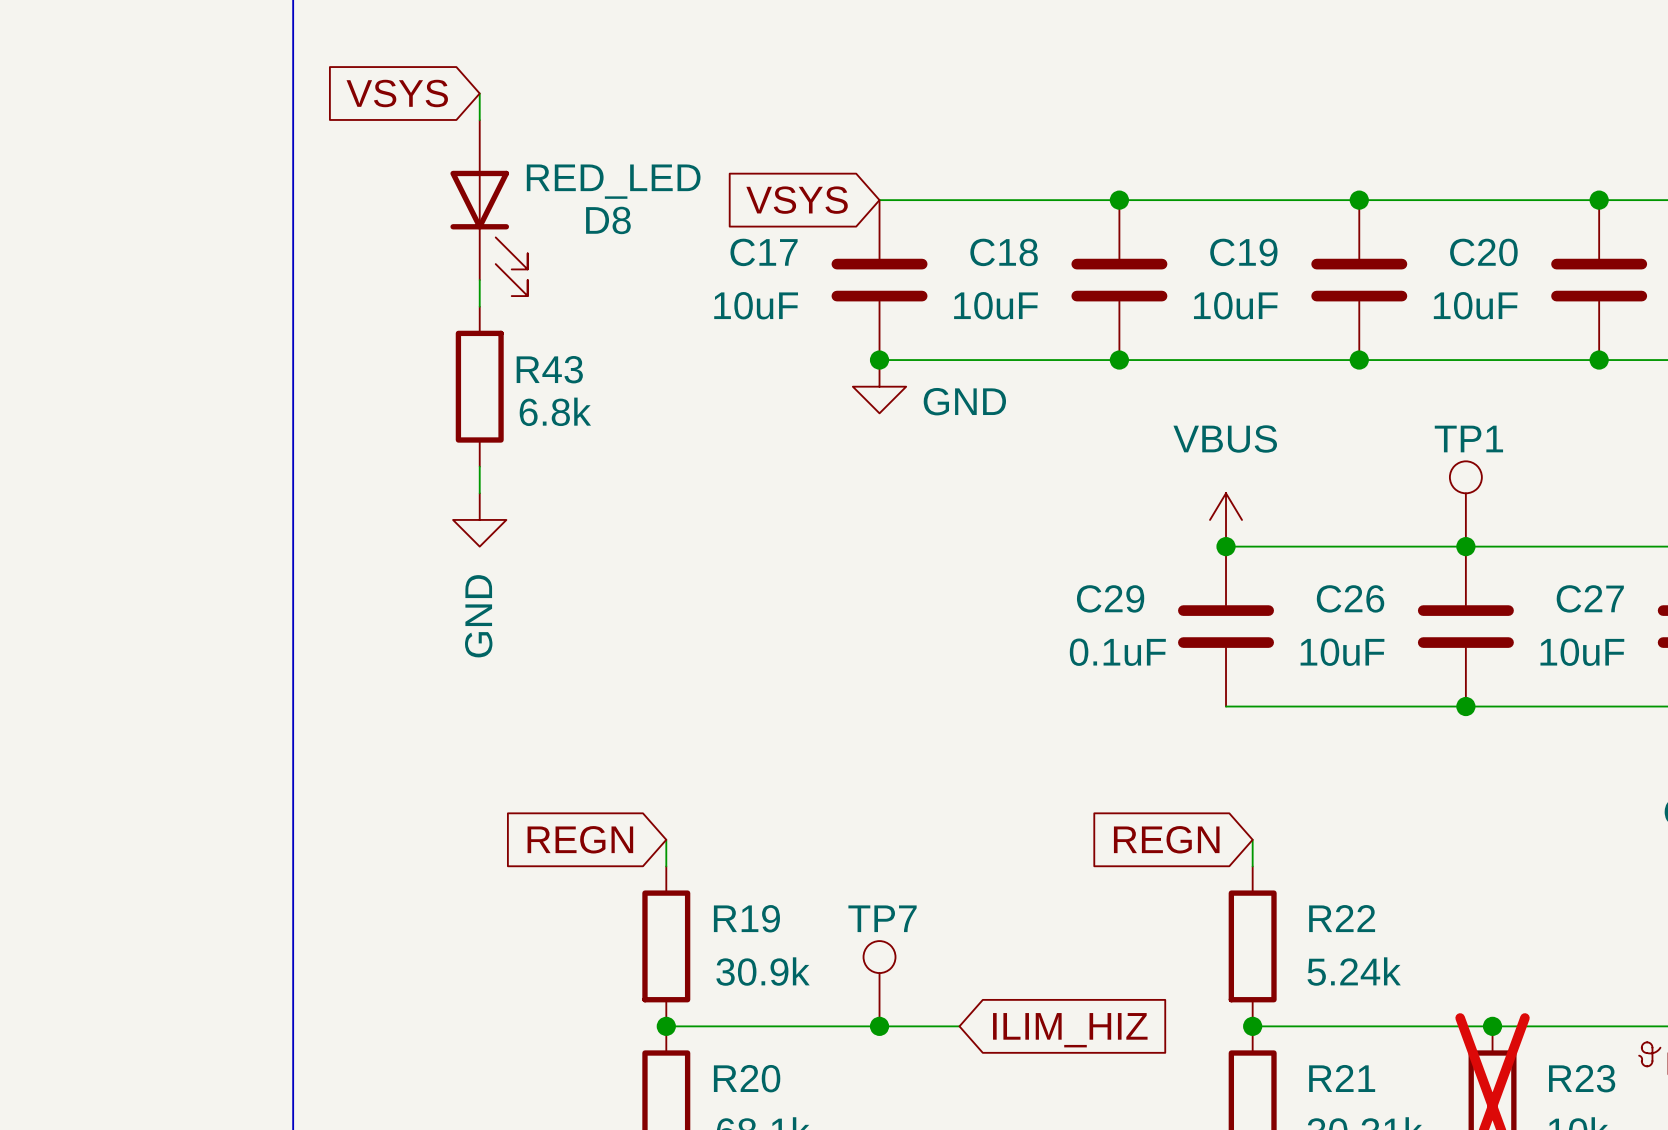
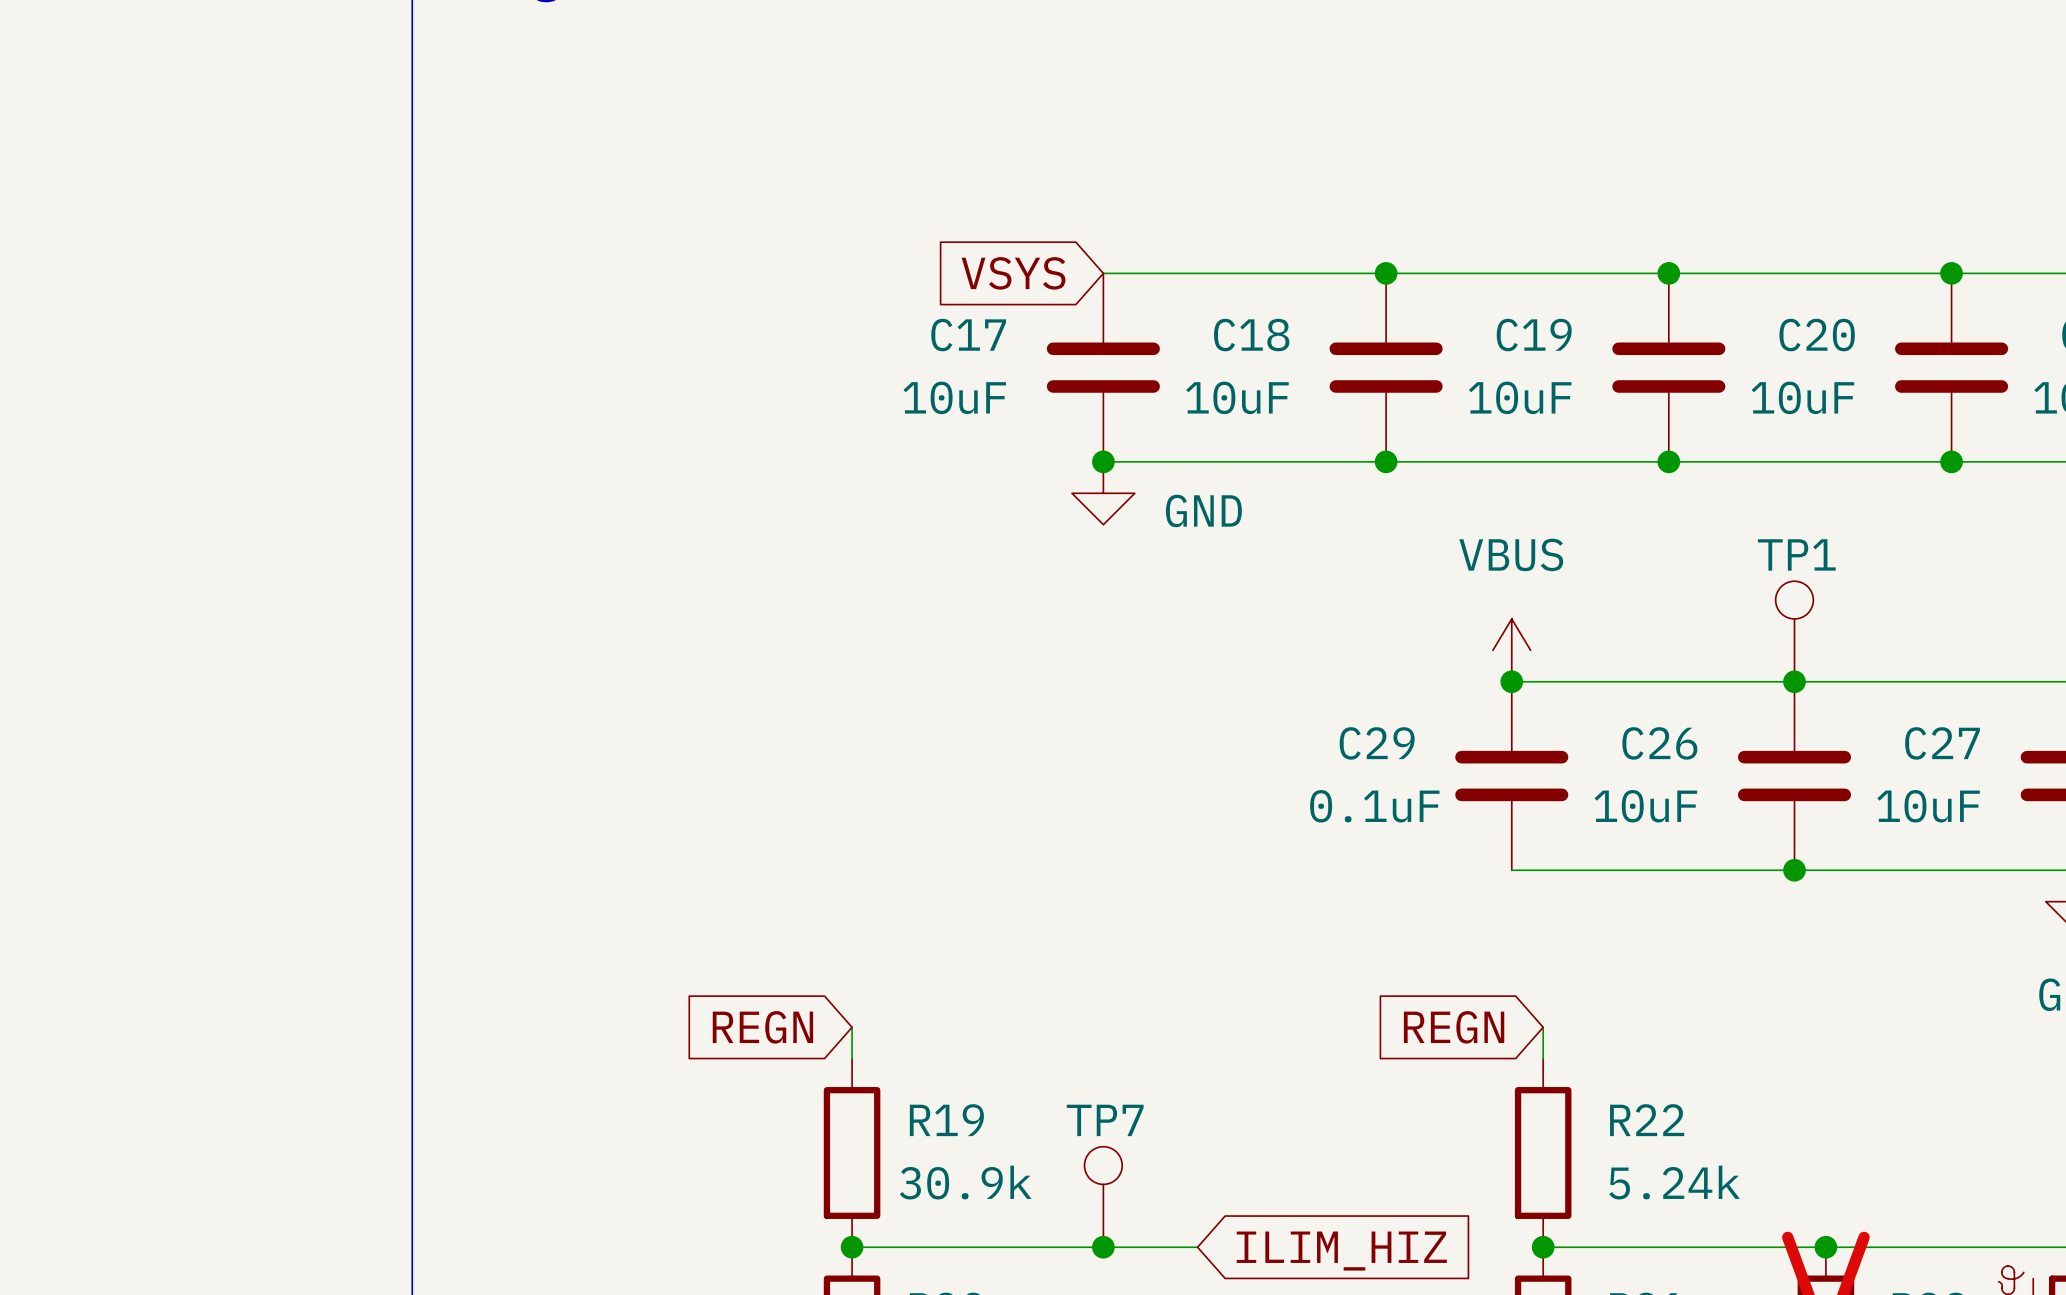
global label: VSYS (397, 93) -> none
wire: (479, 93) (479, 120) -> none
D8: RED_LED (489, 208) -> none
wire: (479, 280) (479, 306) -> none
R43: 6.8k (479, 386) -> none
wire: (479, 466) (479, 493) -> none
power symbol: GND (479, 519) -> none

